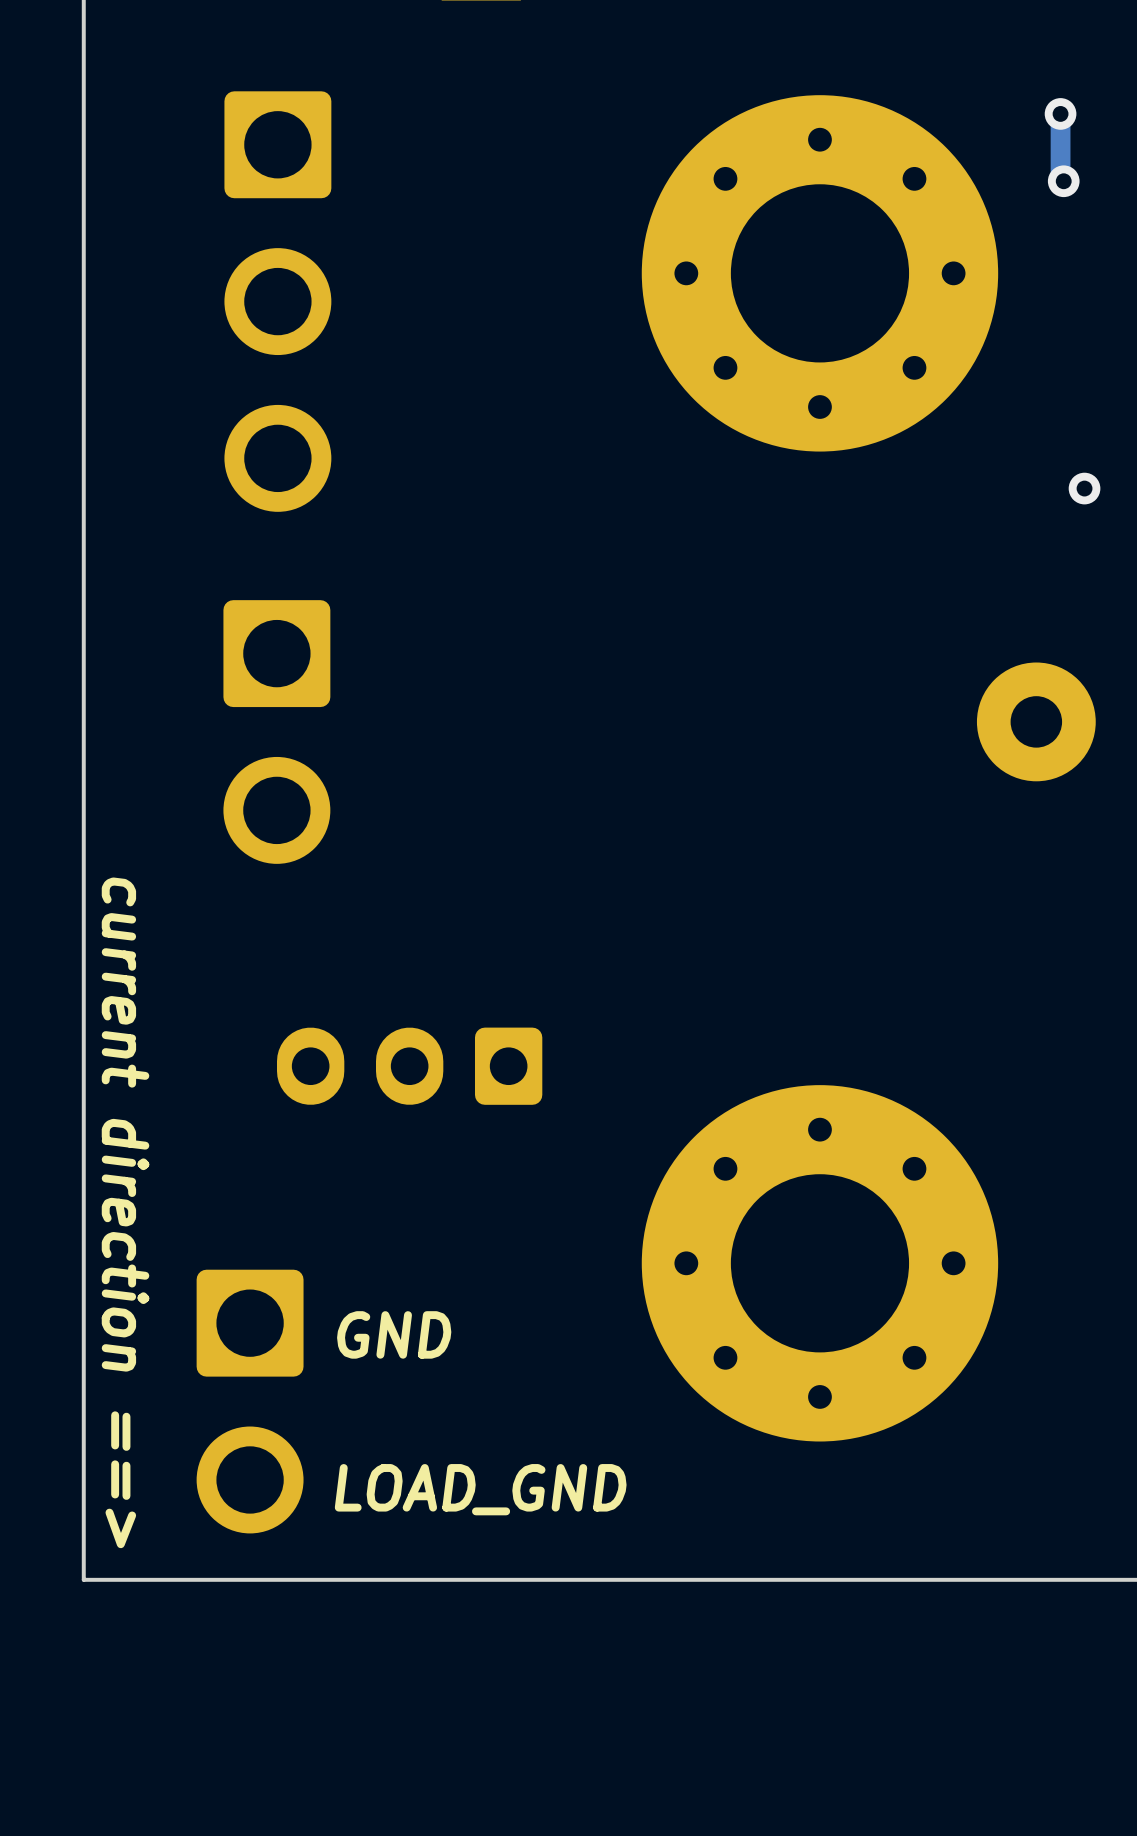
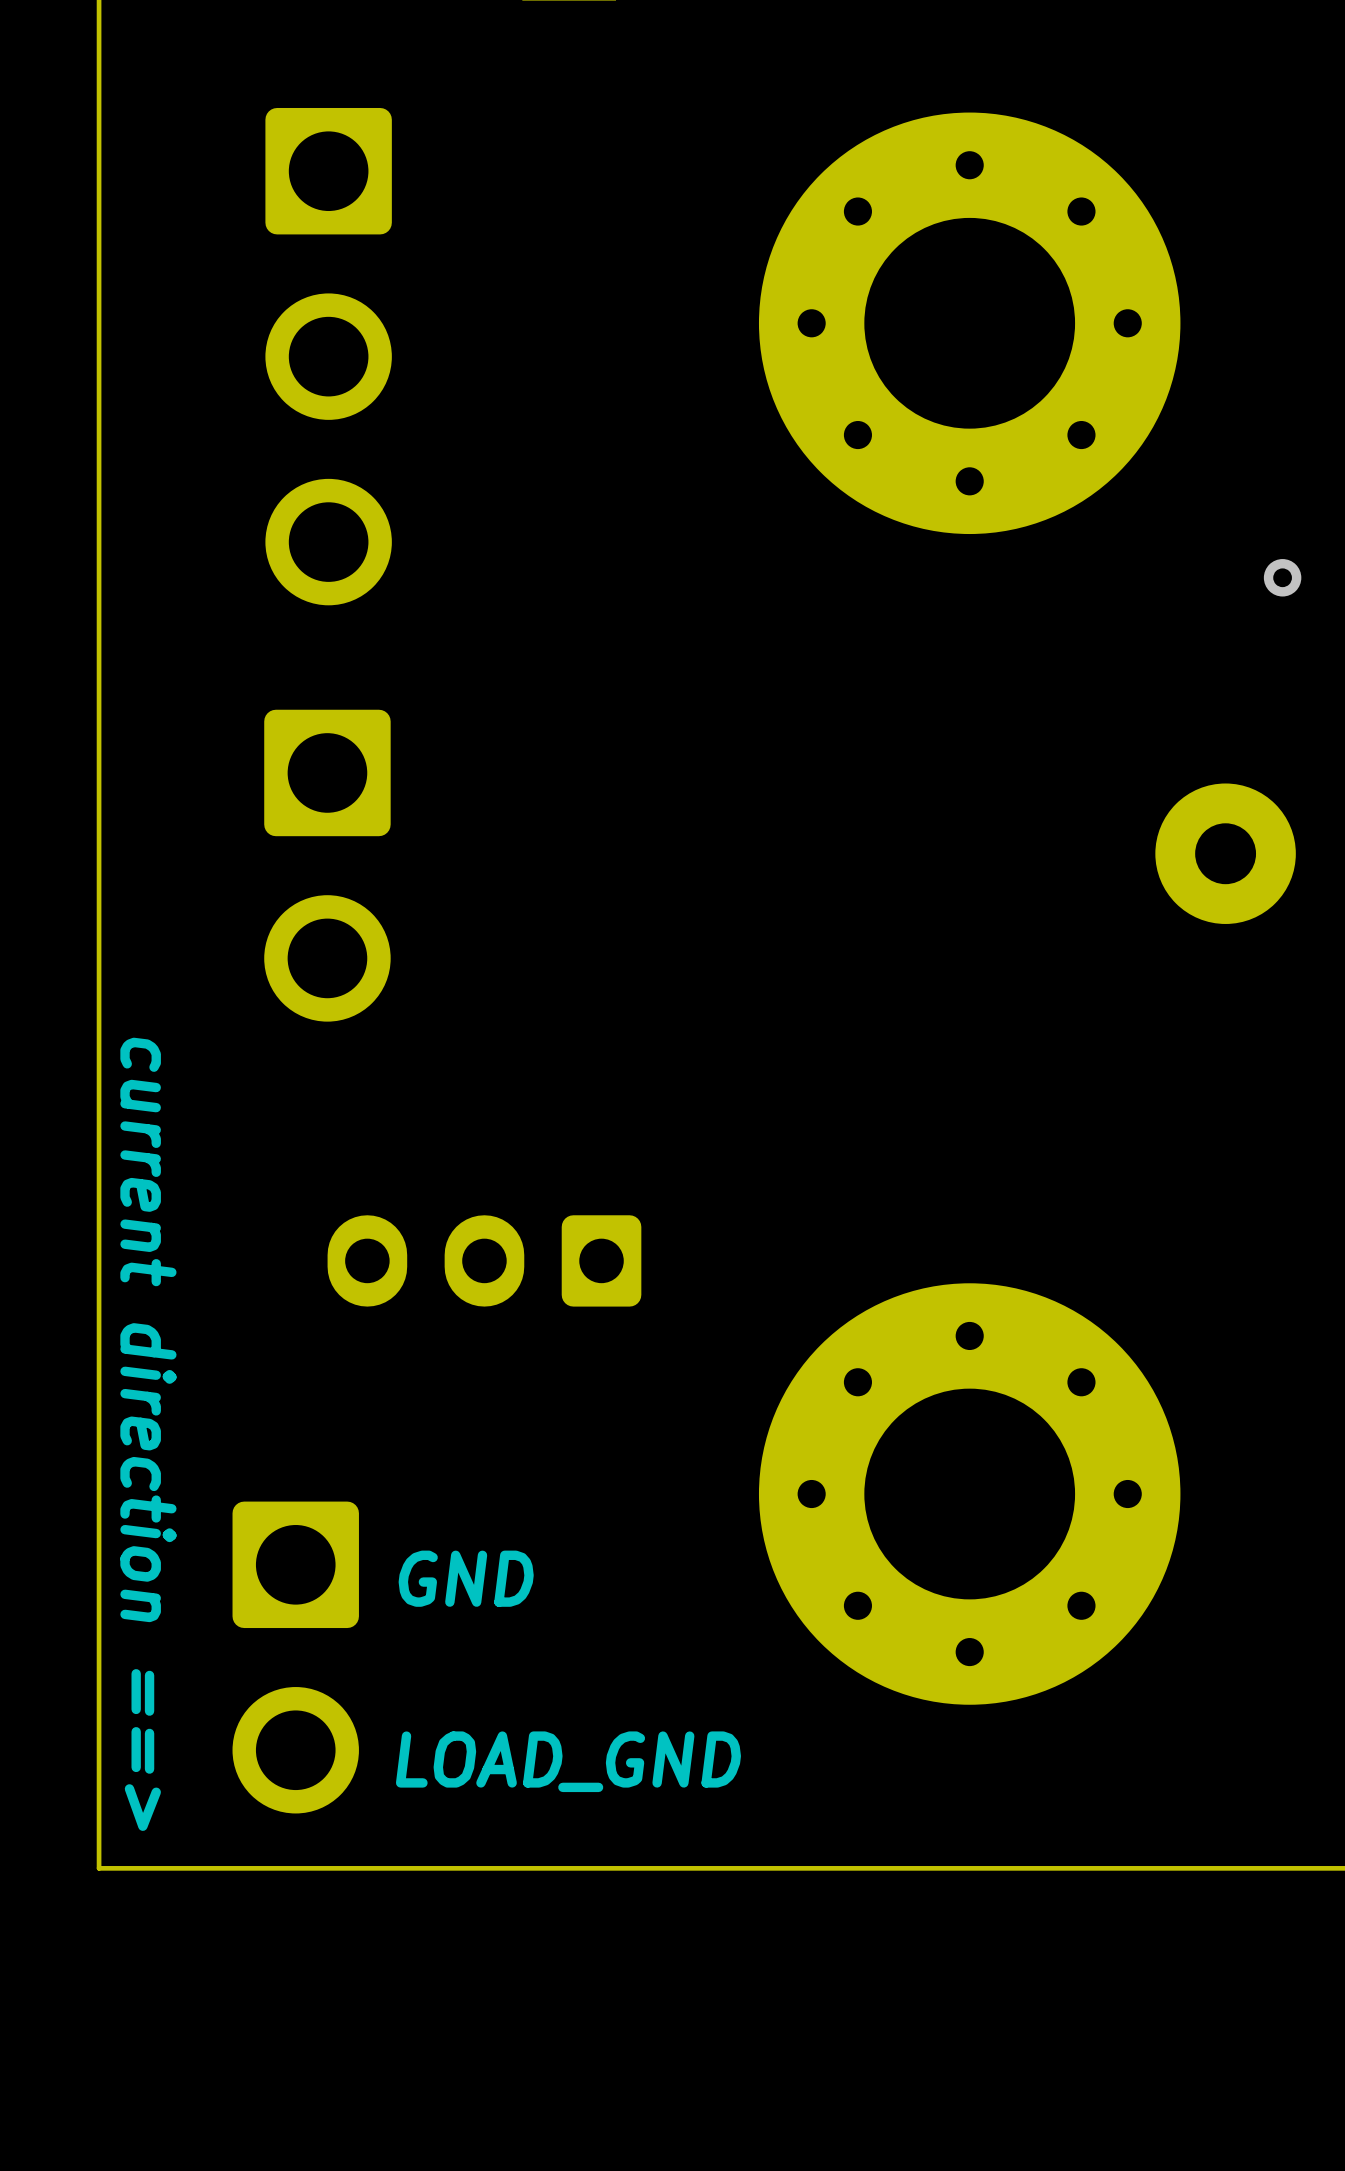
track: (1060, 113) (1060, 178) (1063, 181) -> none
via: (1060, 113) -> none
via: (1063, 181) -> none

